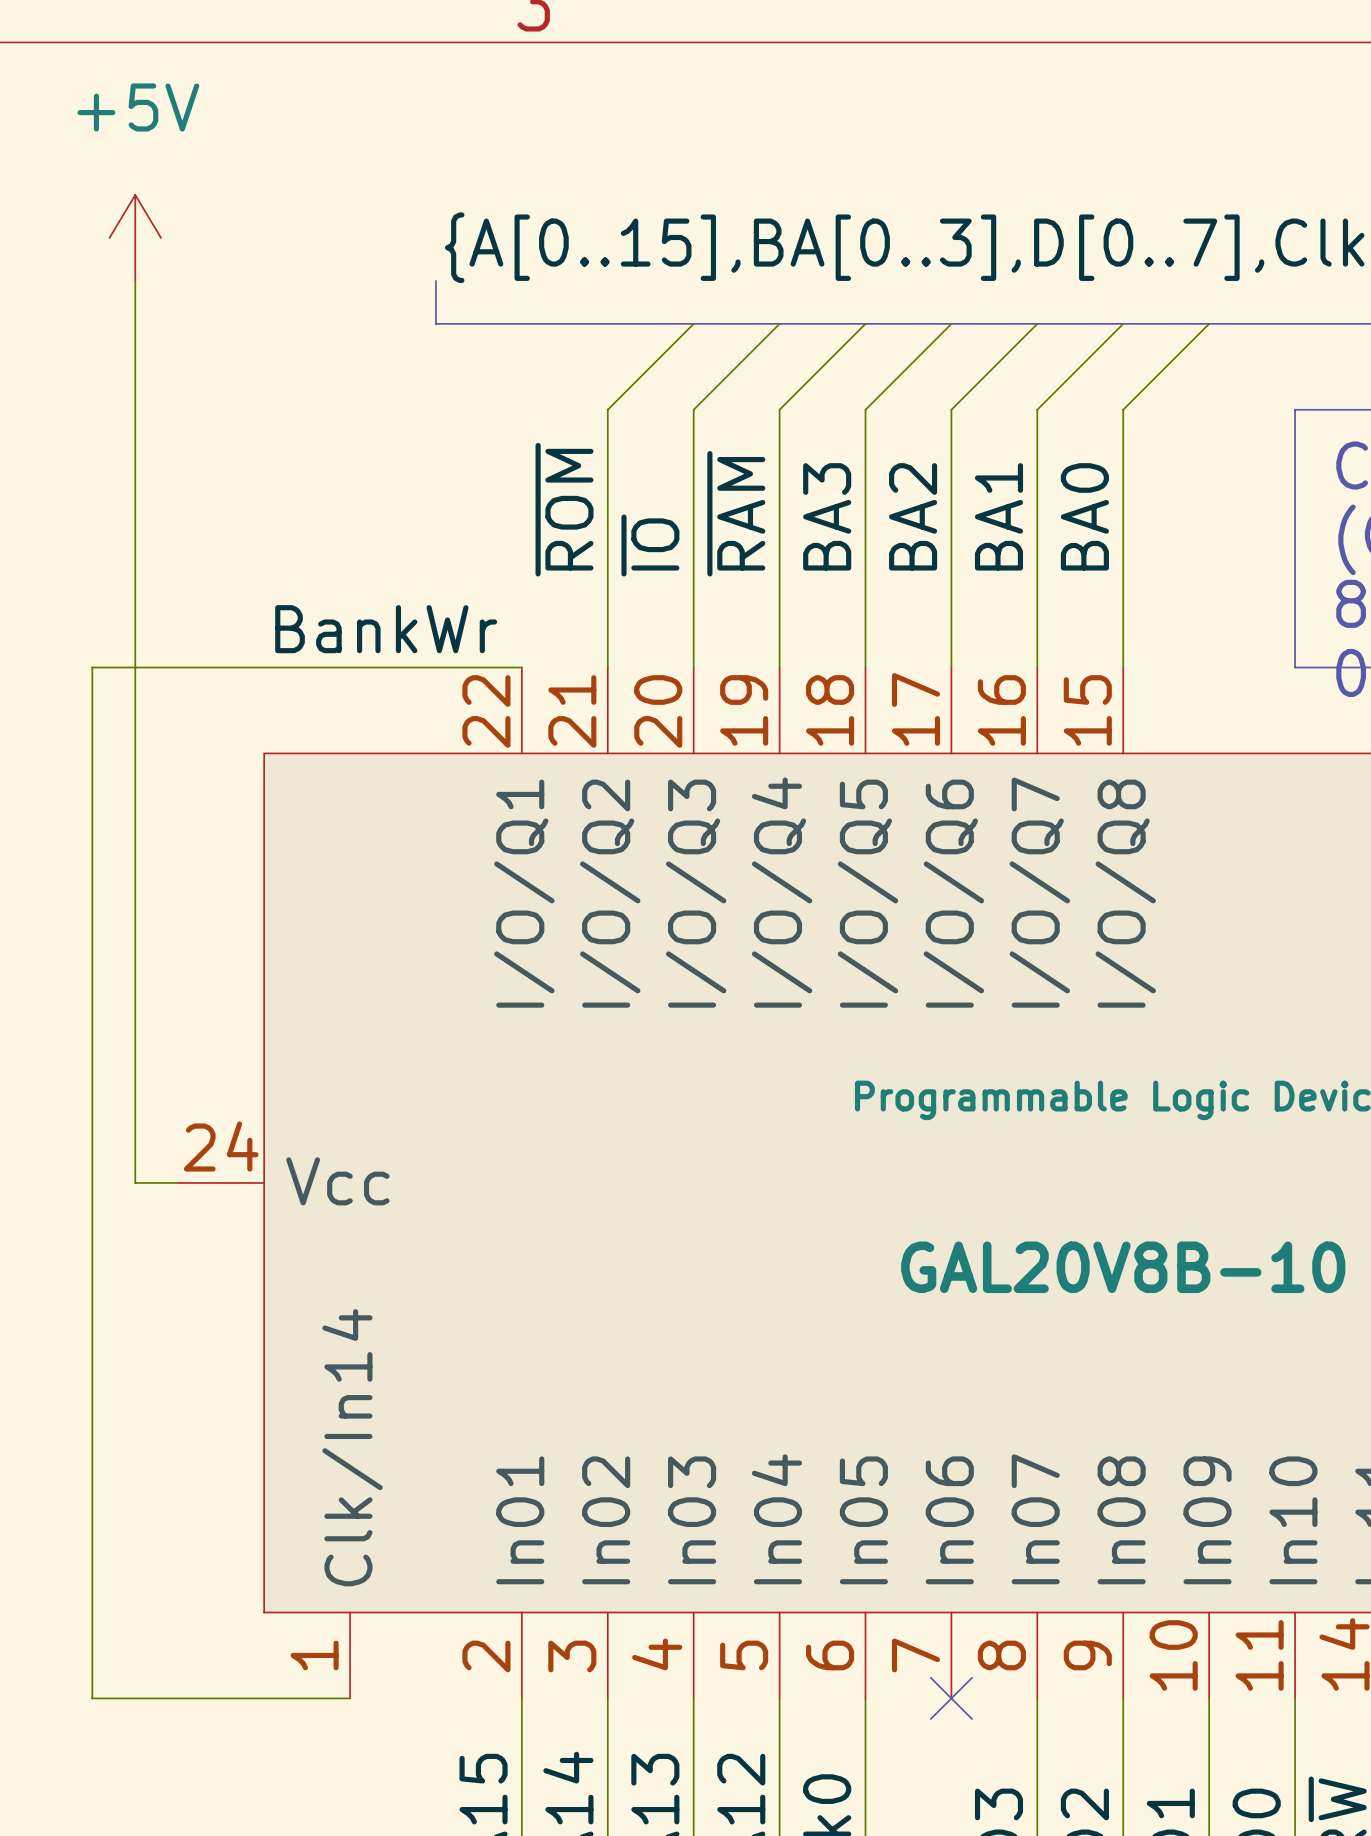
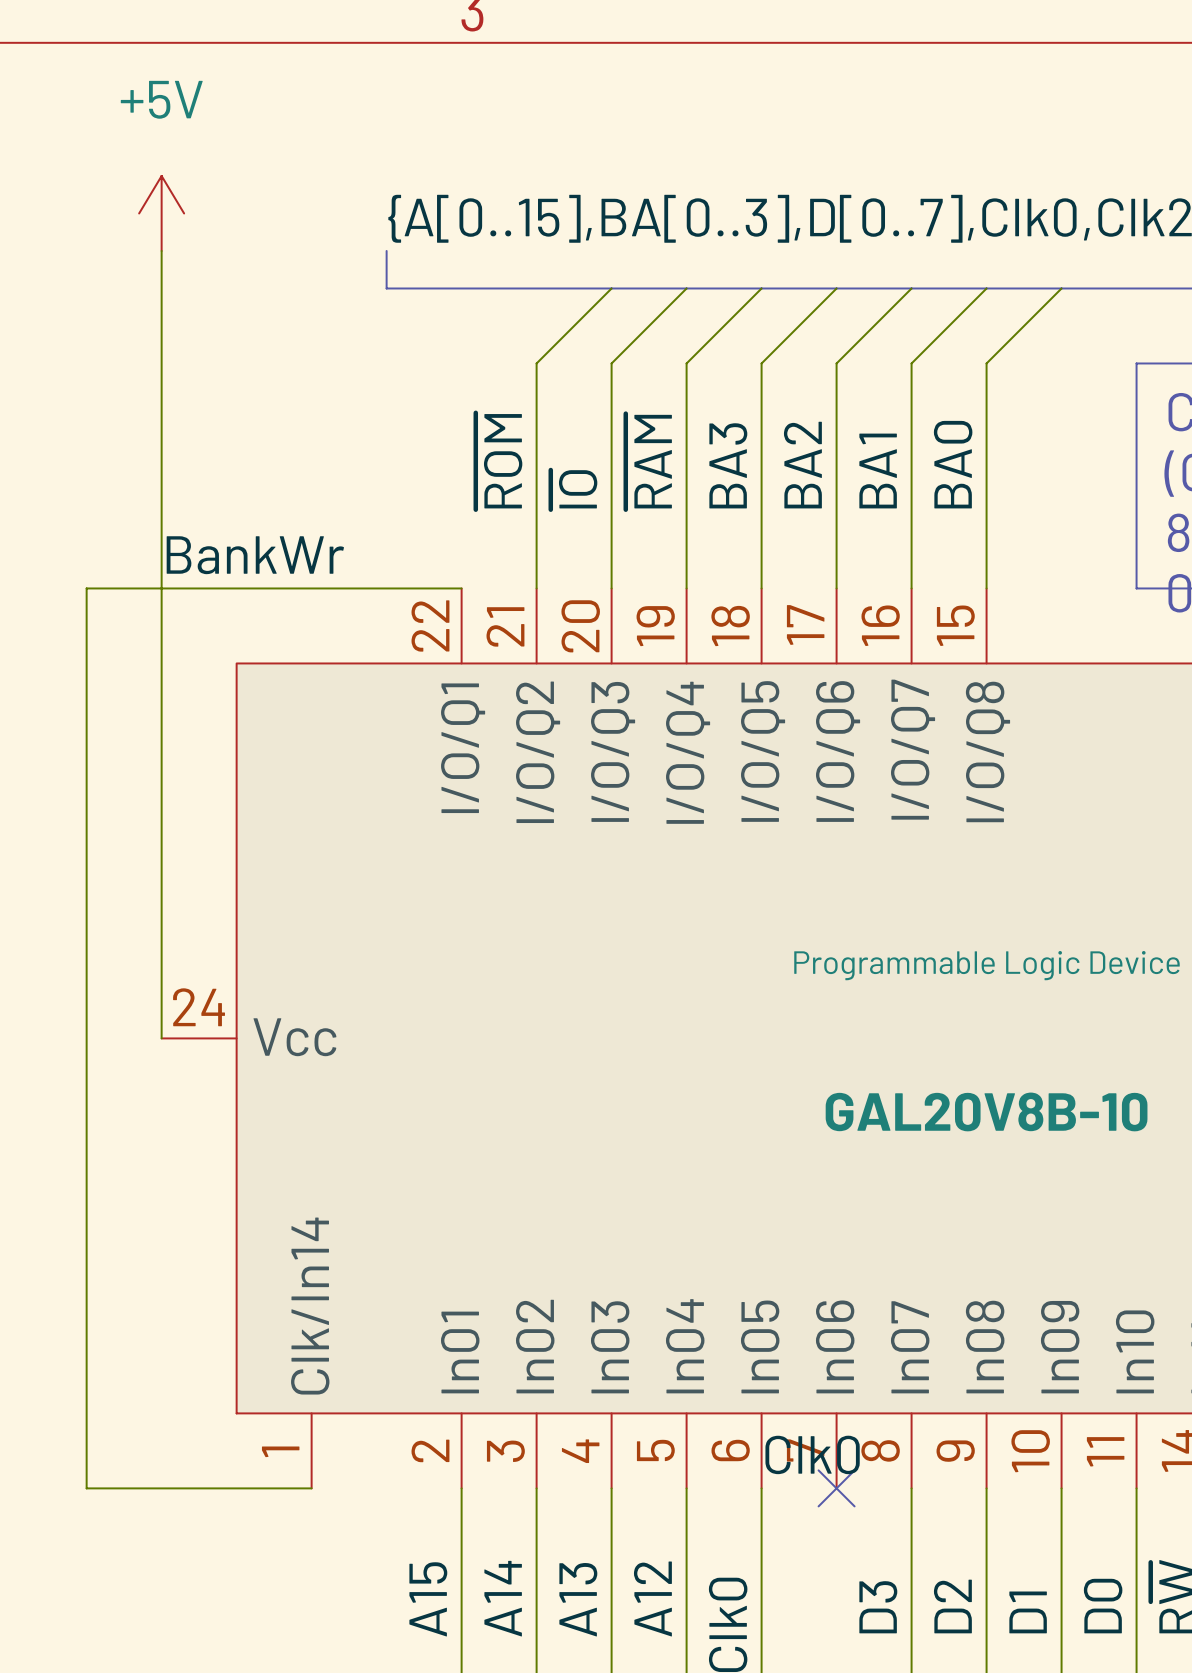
power symbol position: +5V (135, 237) -> +5V (161, 213)
wire: (135, 280) (135, 1182) (178, 1182) -> (161, 250) (161, 1038)
label position: BankWr (386, 629) -> BankWr (255, 555)
label: none -> Clk0 (812, 1454)

